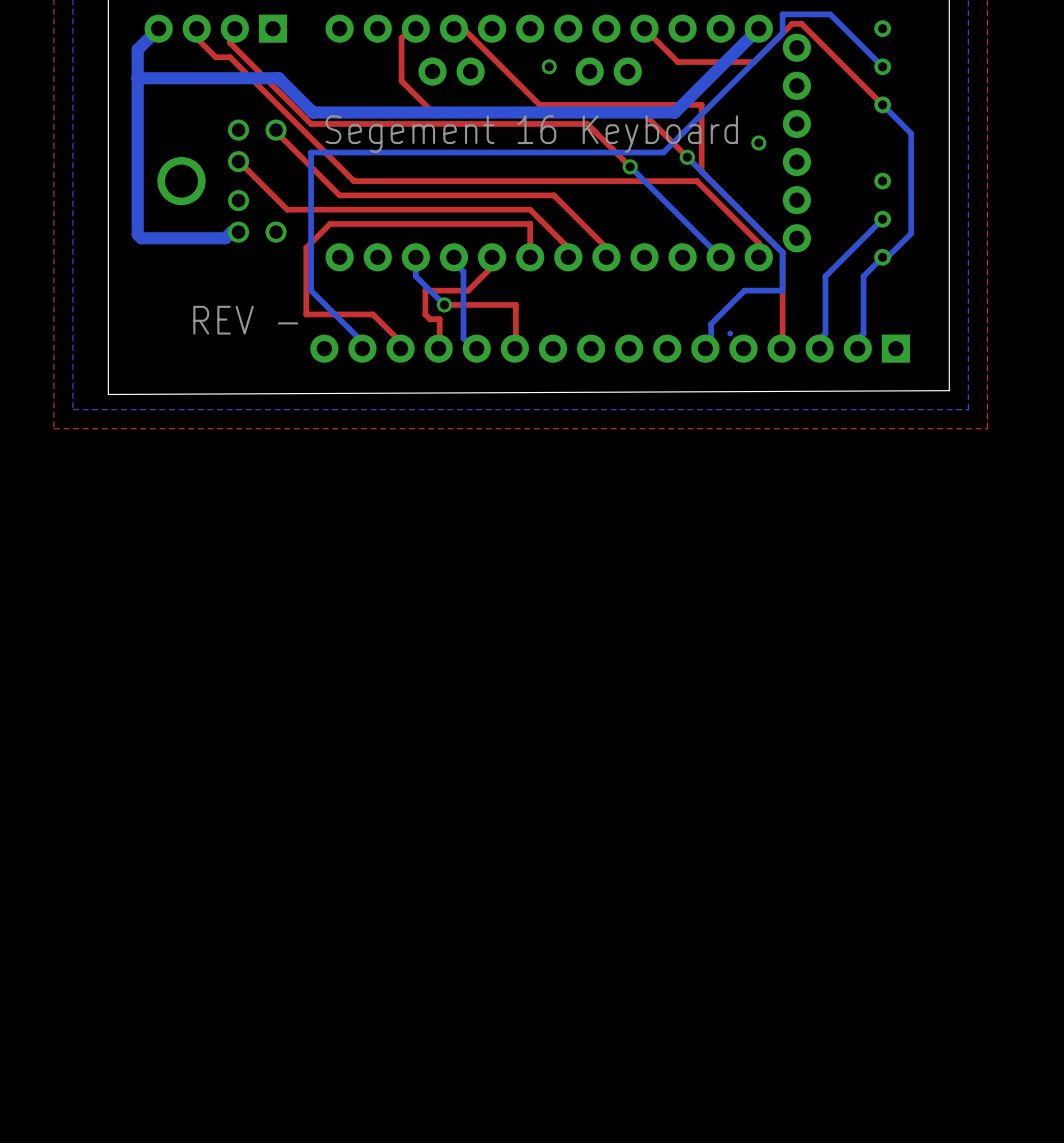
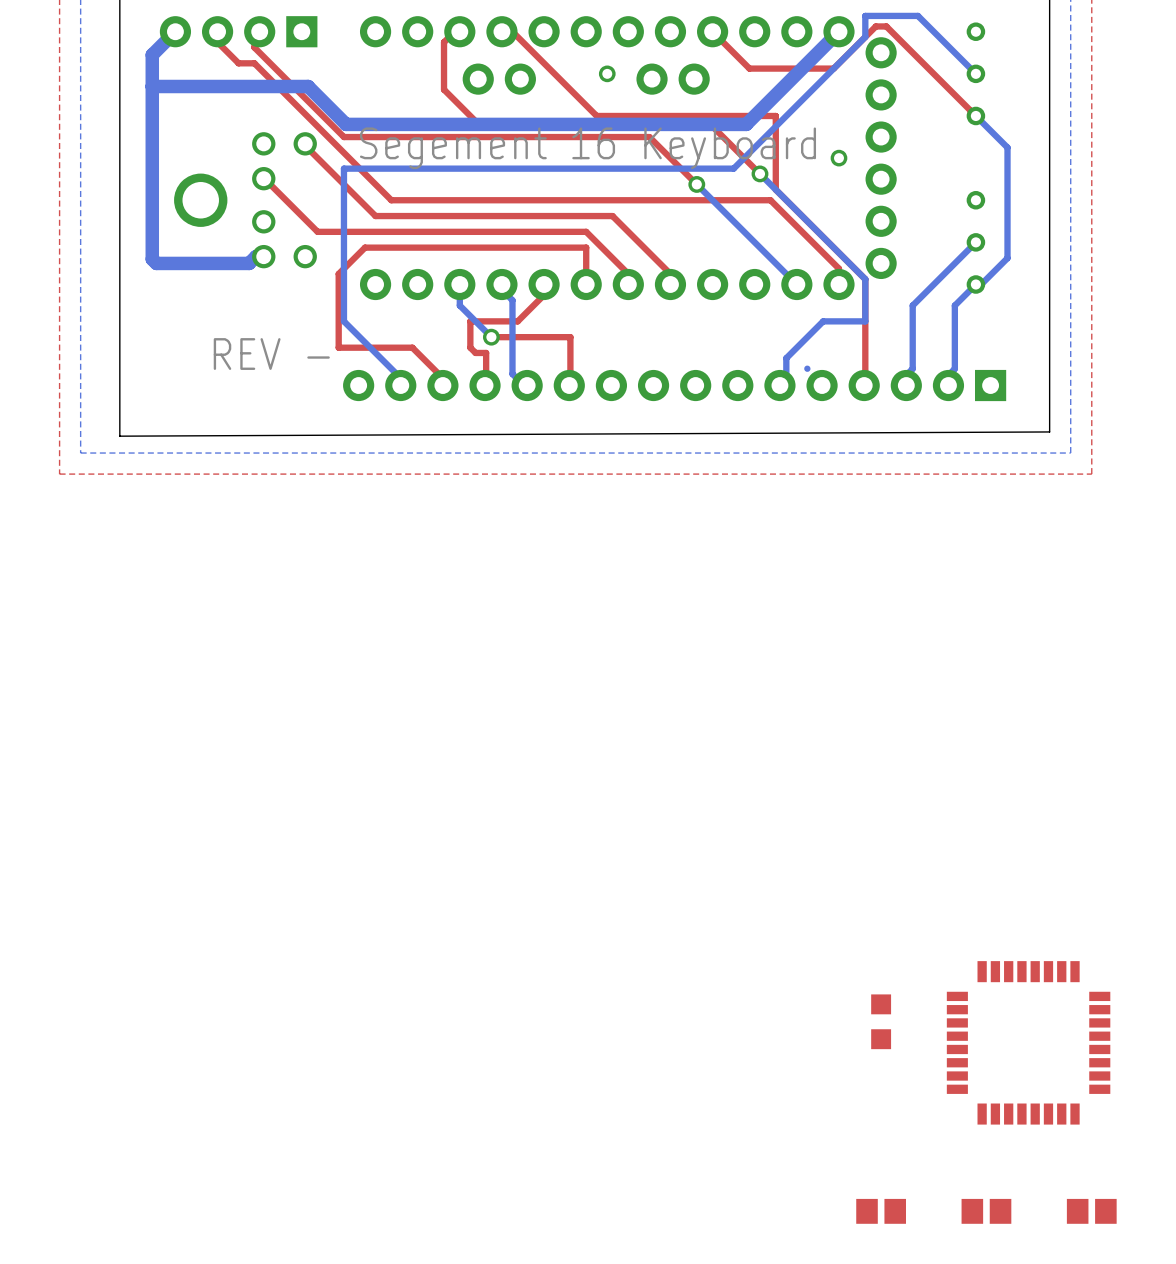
part: none -> (881, 1021)
part: none -> (1028, 1042)
part: none -> (881, 1211)
part: none -> (986, 1211)
part: none -> (1091, 1211)

